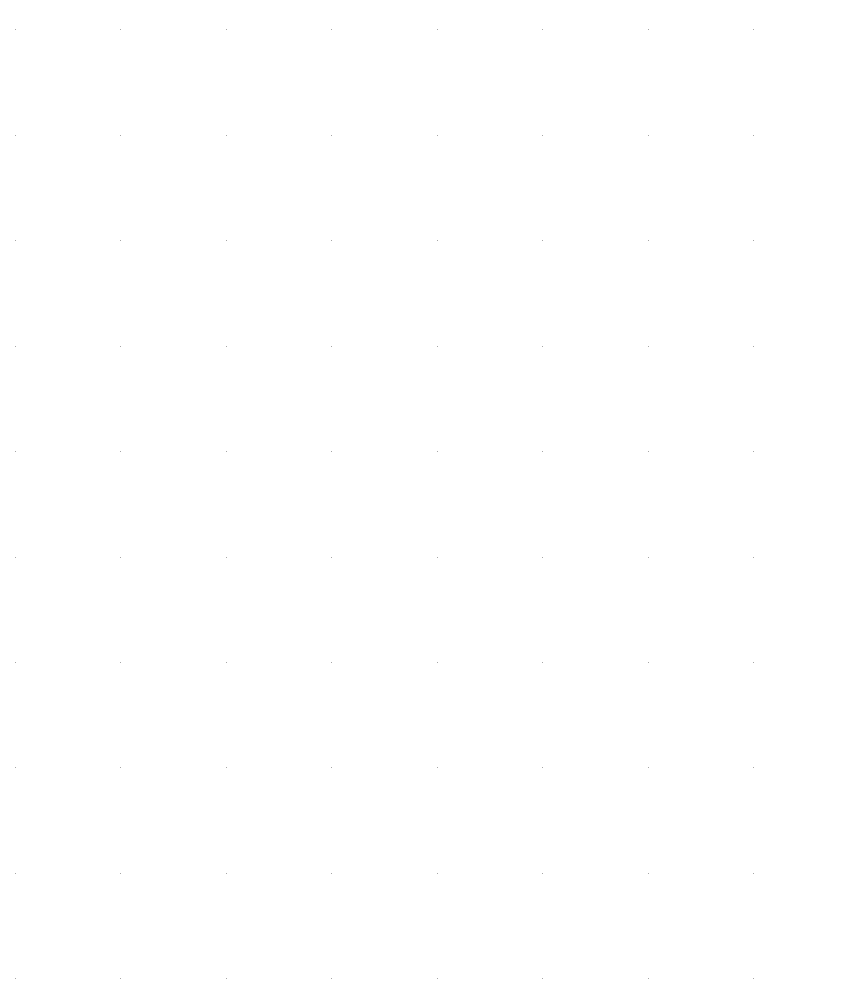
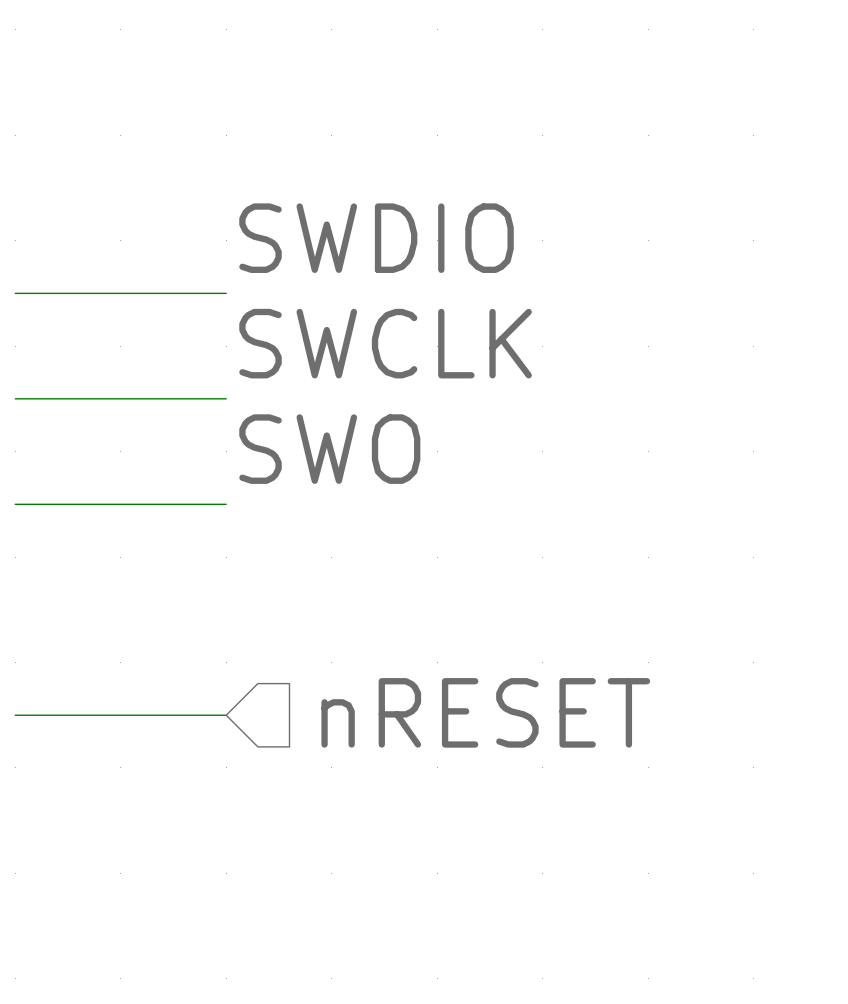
label: none -> SWDIO (376, 238)
wire: none -> (15, 293) (226, 293)
label: none -> SWCLK (385, 343)
wire: none -> (15, 398) (226, 398)
label: none -> SWO (329, 449)
wire: none -> (15, 504) (226, 504)
hierarchical label: none -> nRESET (485, 712)
wire: none -> (15, 715) (226, 715)

